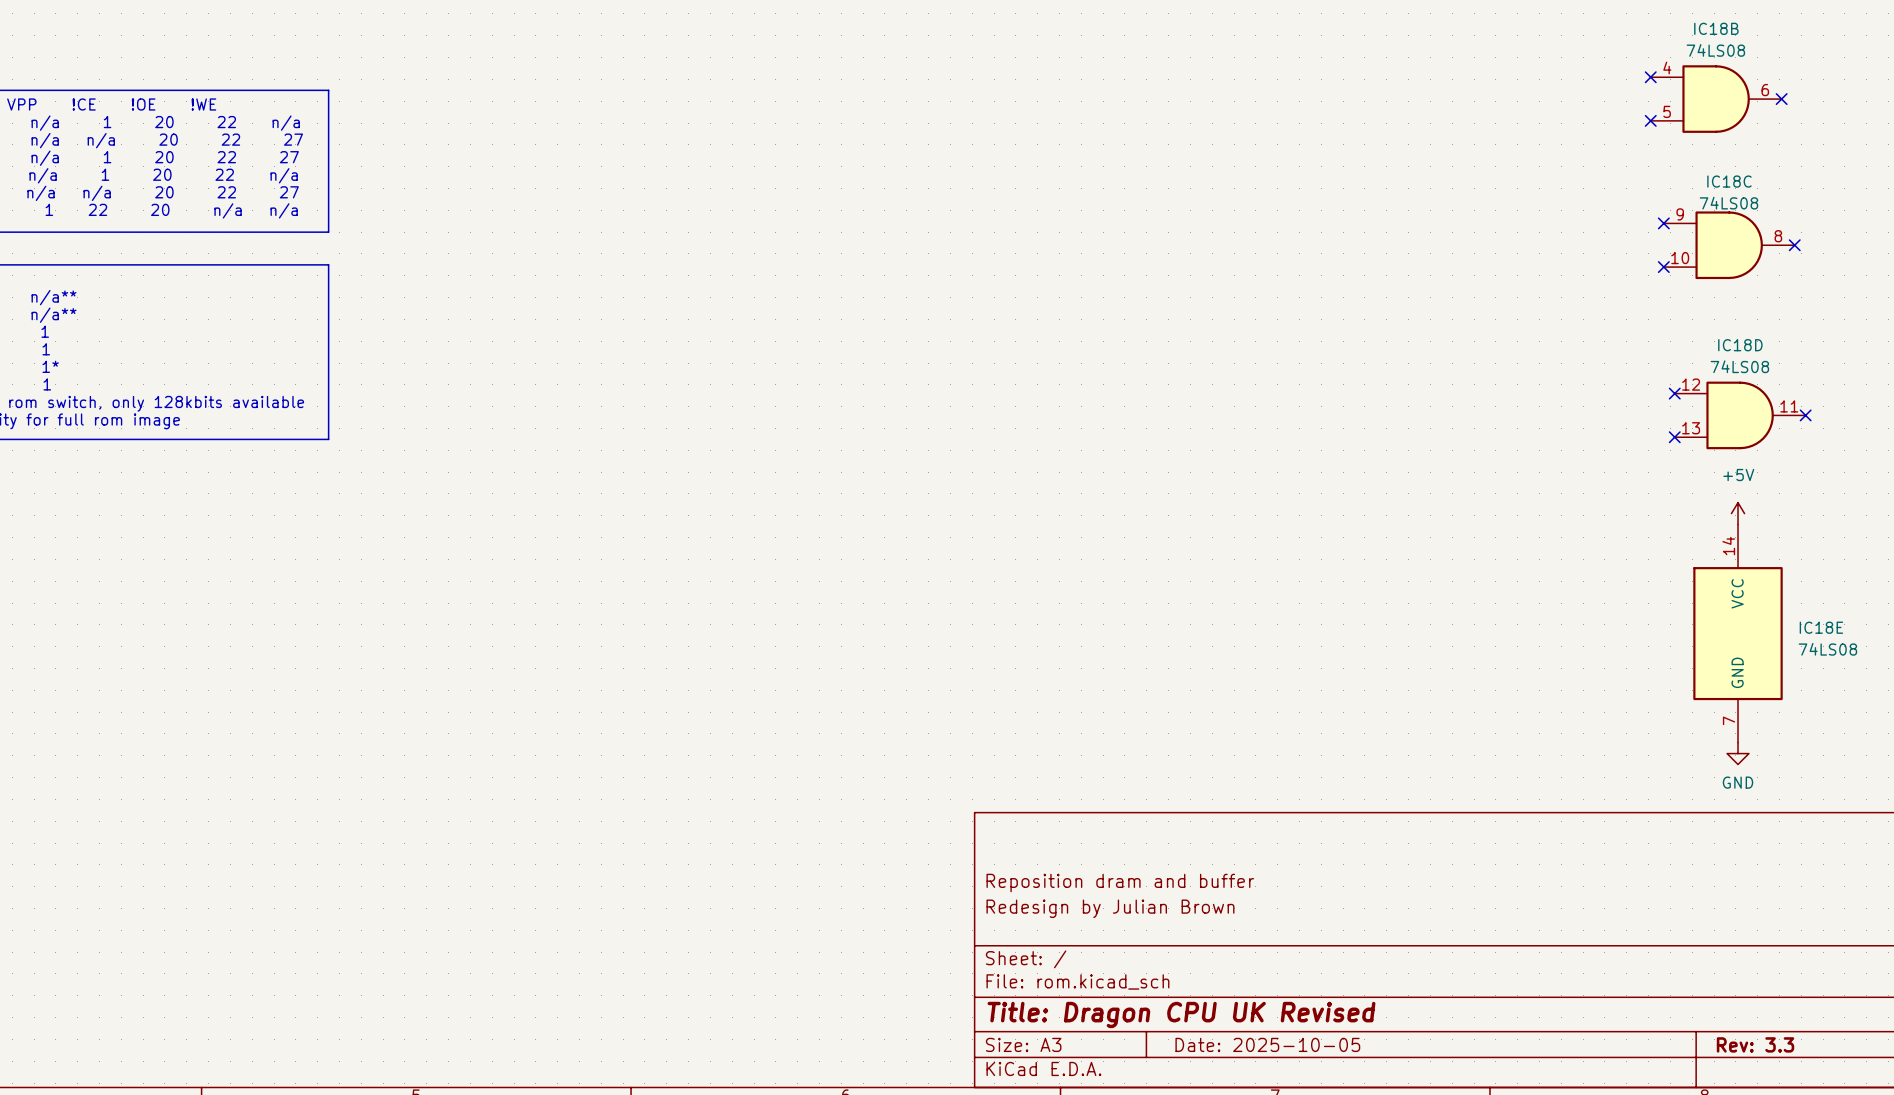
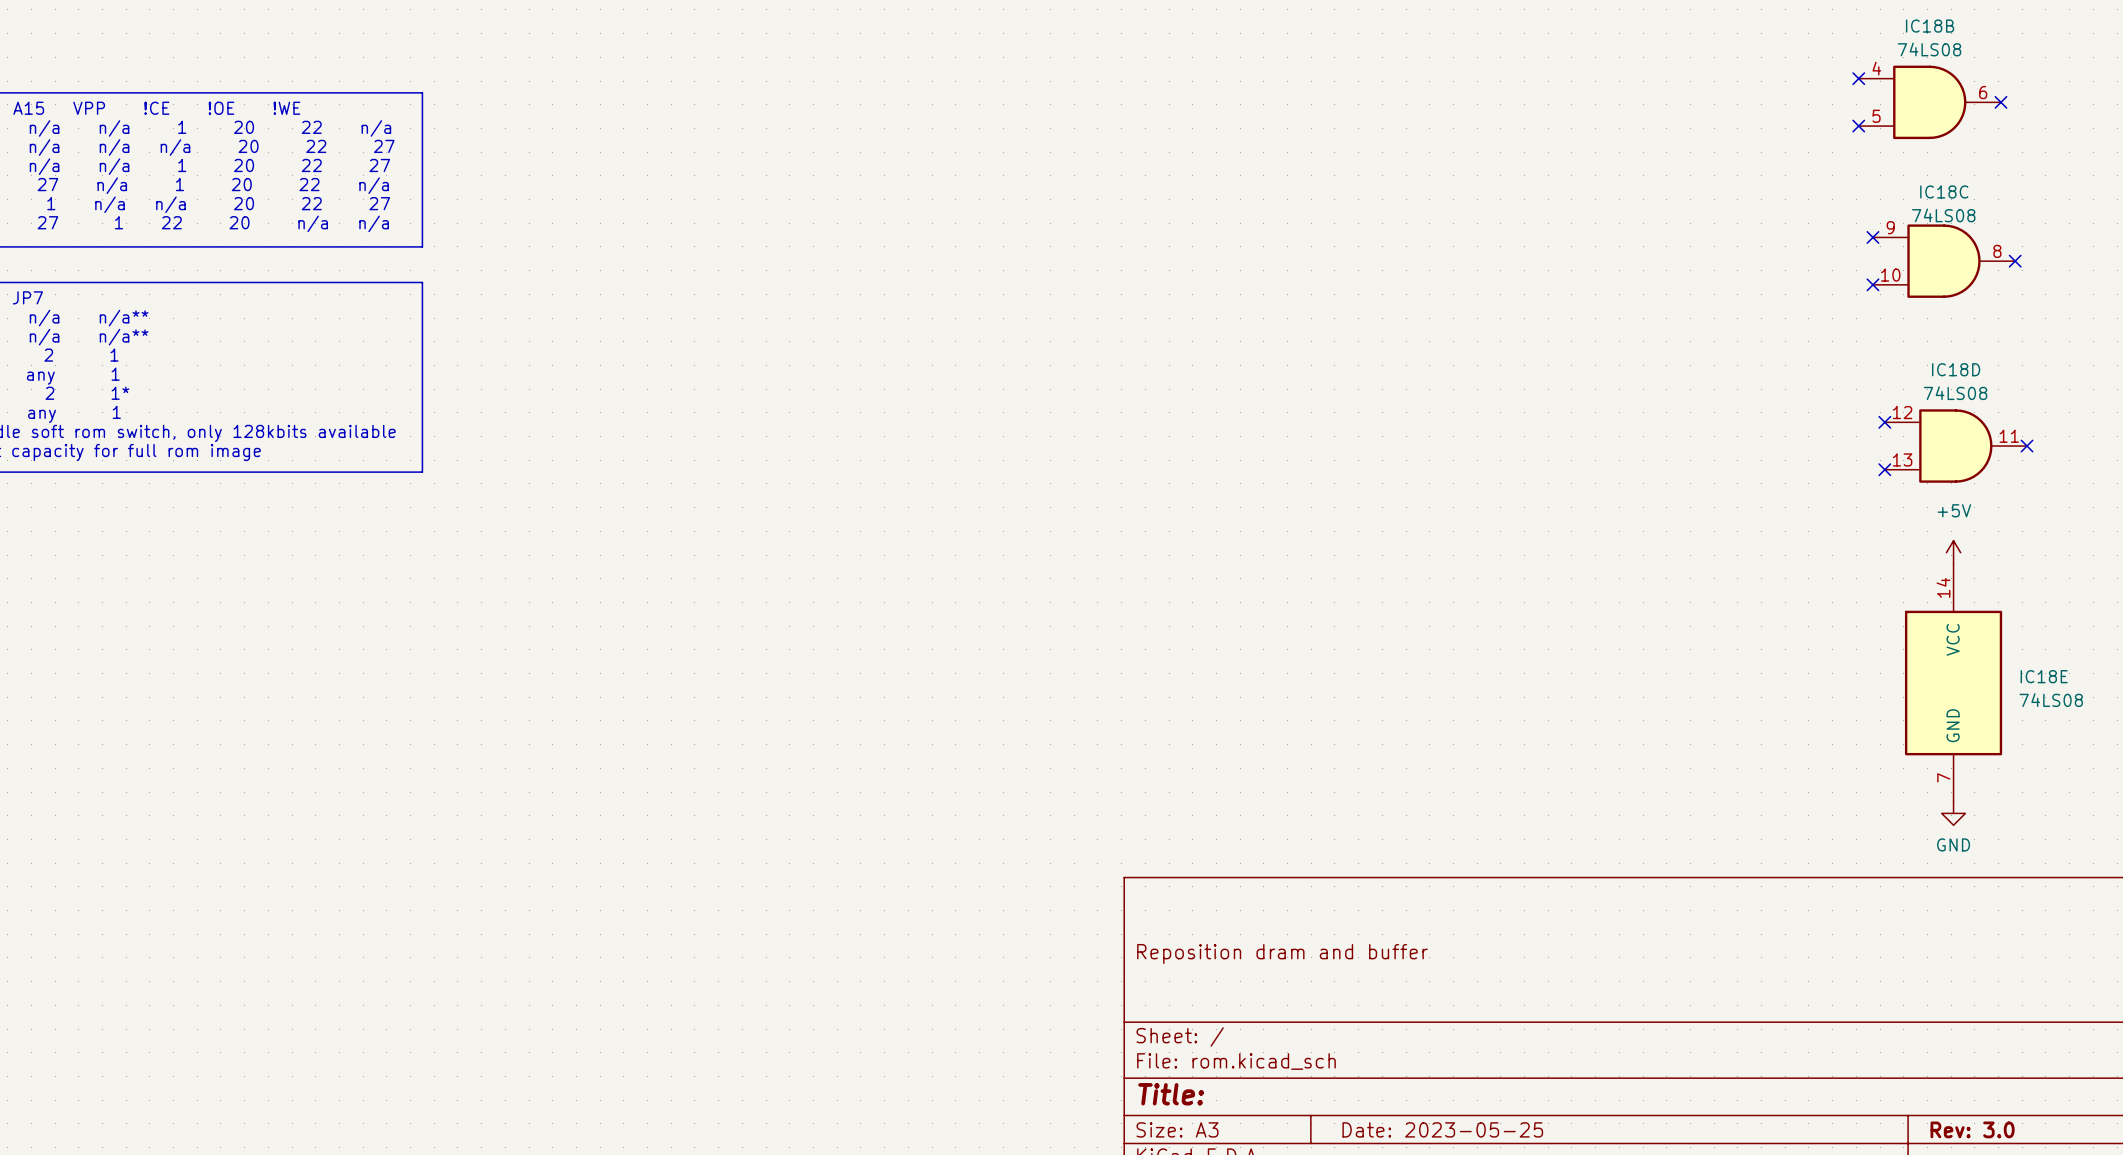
title block: Redesign by Julian Brown (1110, 908) -> none
title block: Title: Dragon CPU UK Revised (1181, 1014) -> Title: (1171, 1094)
title block: Date: 2025-10-05 (1267, 1044) -> Date: 2023-05-25 (1442, 1129)
title block: Rev: 3.3 (1755, 1044) -> Rev: 3.0 (1972, 1129)

